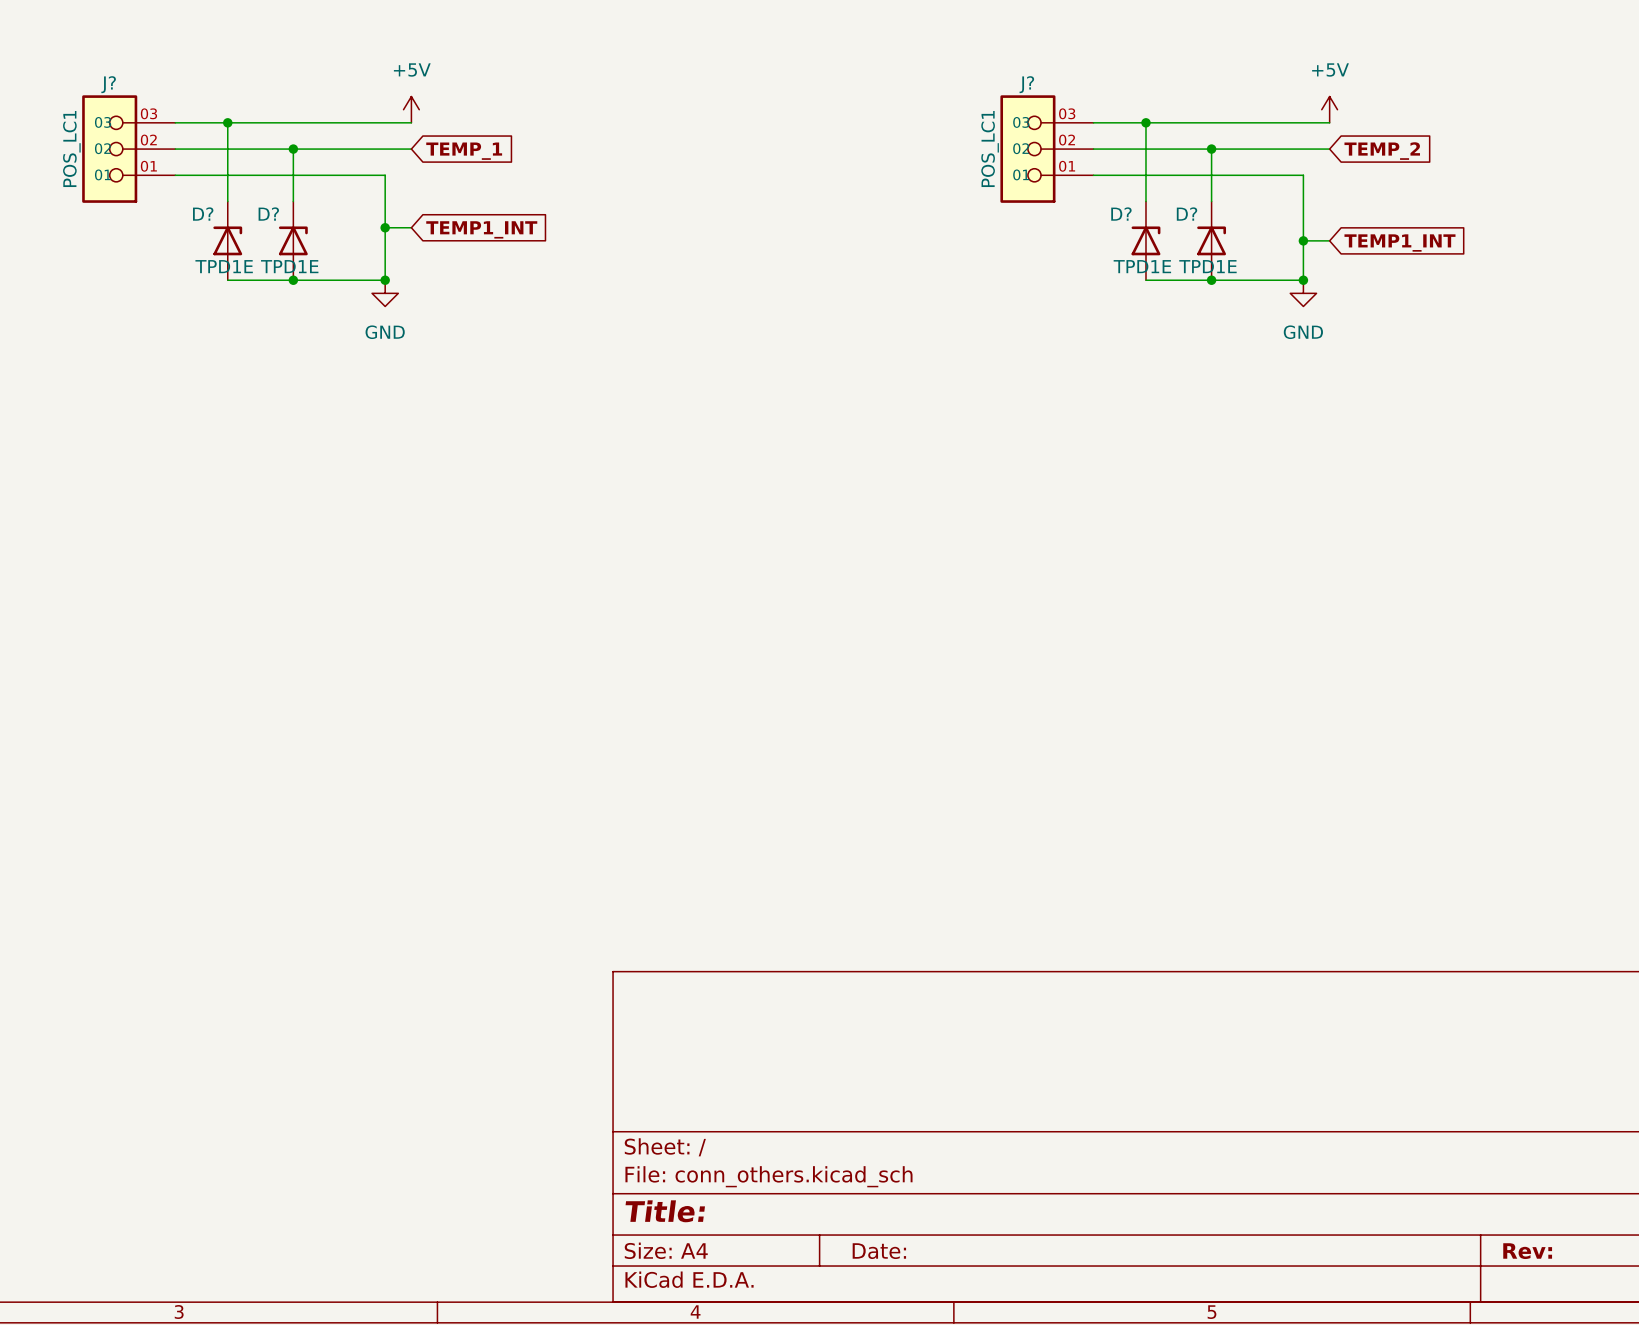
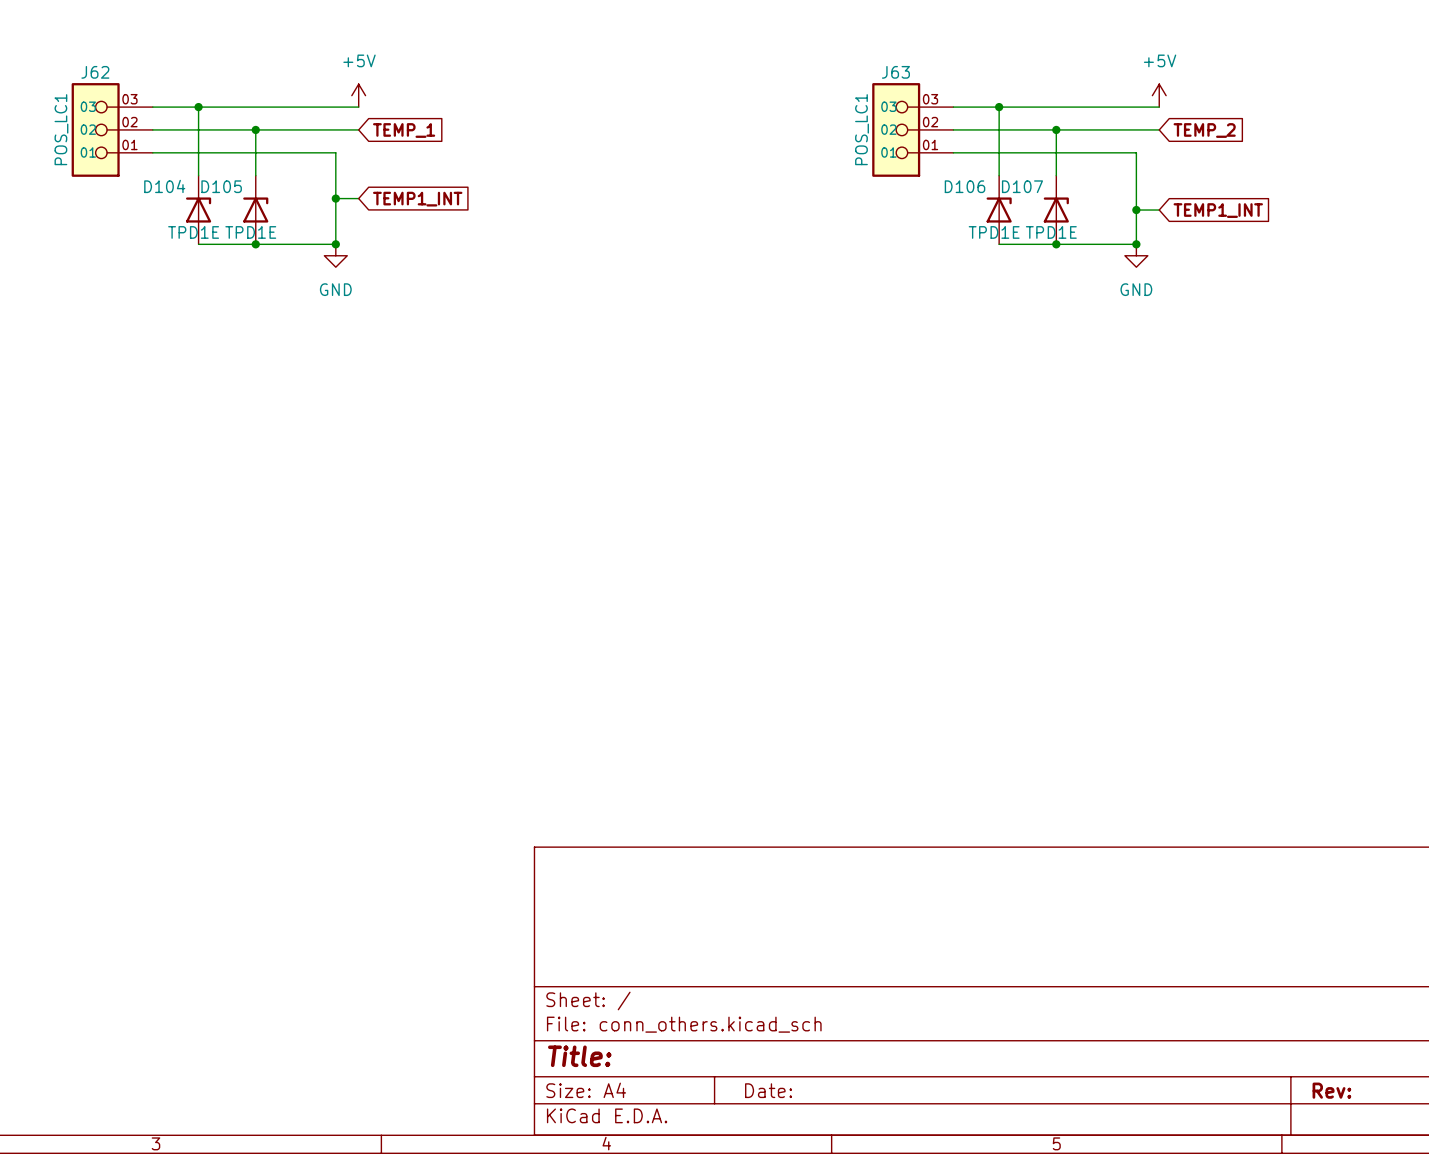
J? name: J? (108, 84) -> J62 (95, 72)
J? name: J? (1026, 84) -> J63 (895, 72)
D? name: D? (203, 214) -> D104 (164, 186)
D? name: D? (268, 214) -> D105 (221, 186)
D? name: D? (1121, 214) -> D106 (965, 186)
D? name: D? (1187, 214) -> D107 (1022, 186)

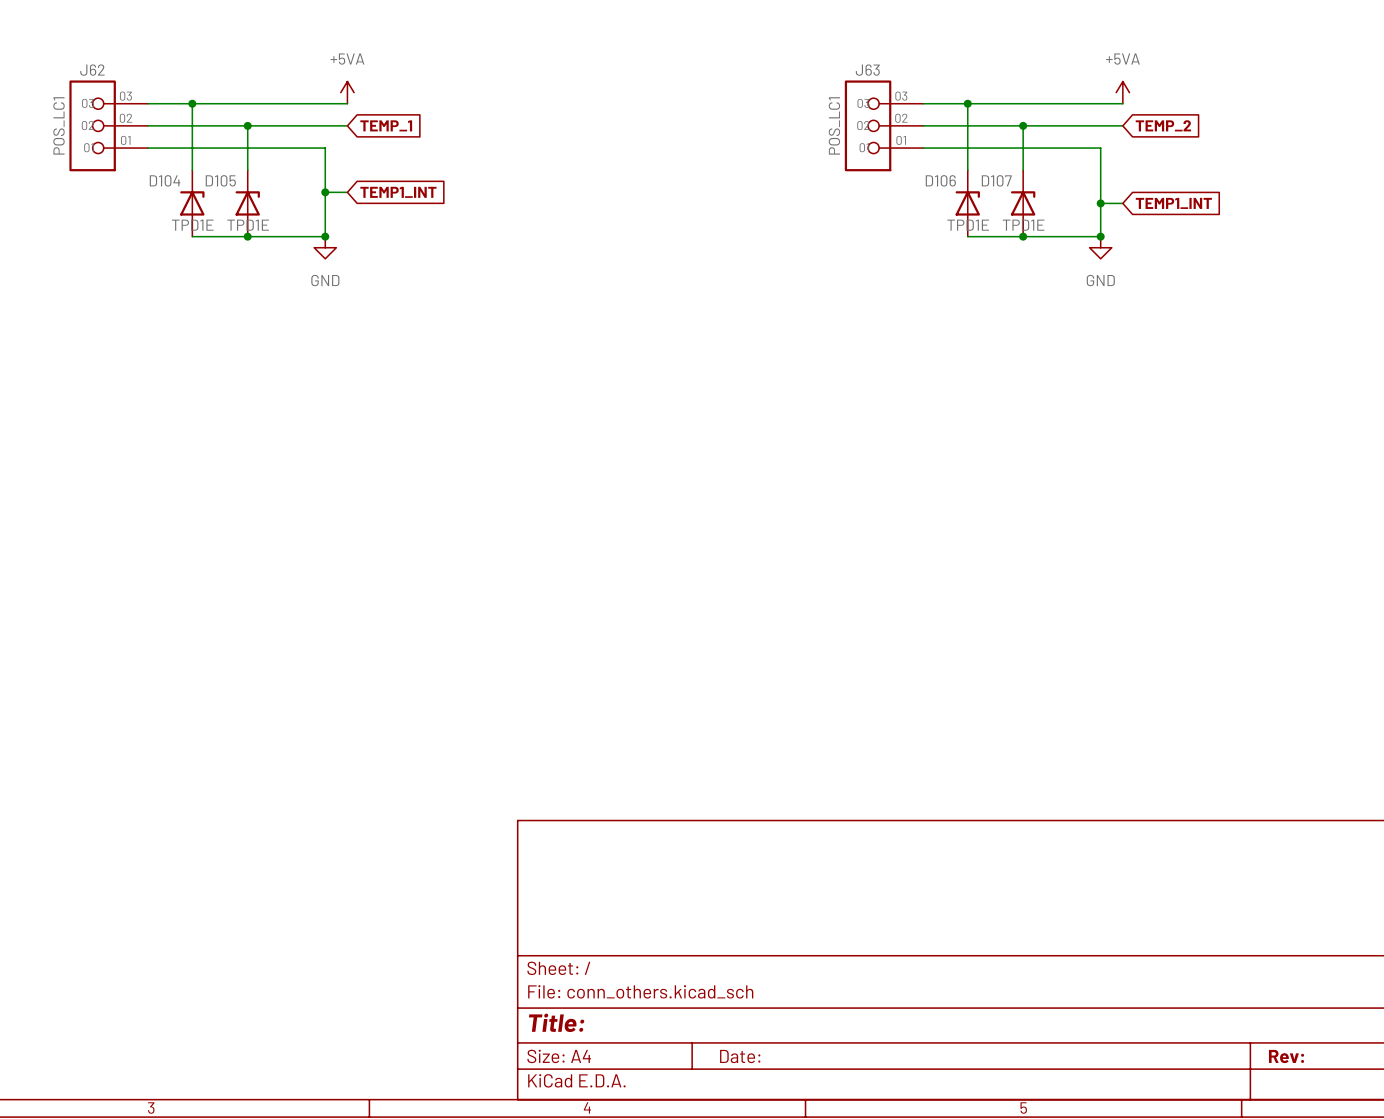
power symbol: +5V (358, 95) -> +5VA (347, 92)
power symbol: +5V (1159, 95) -> +5VA (1122, 92)

